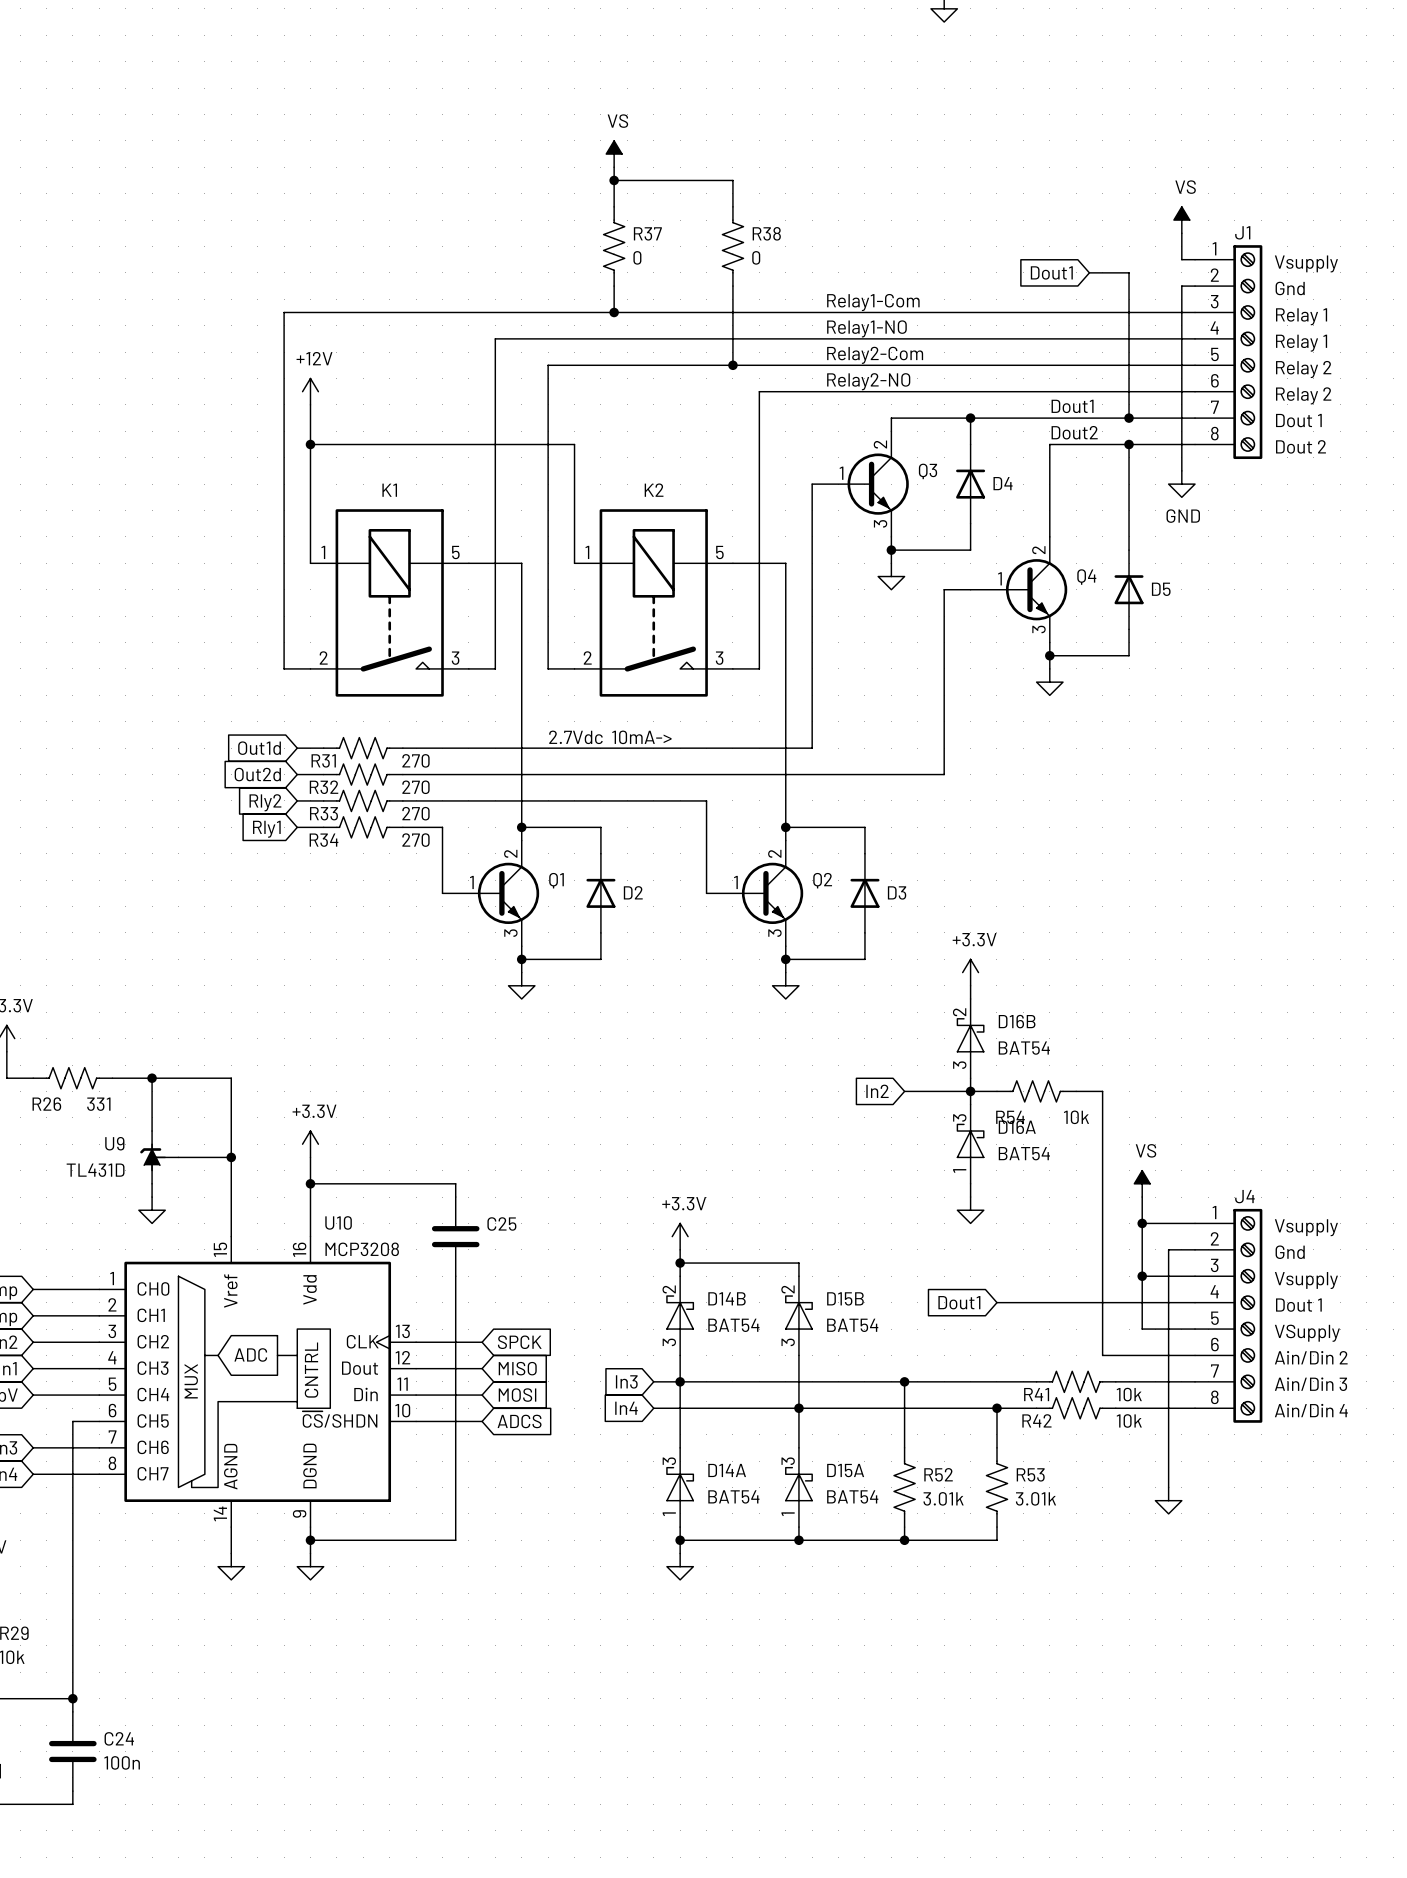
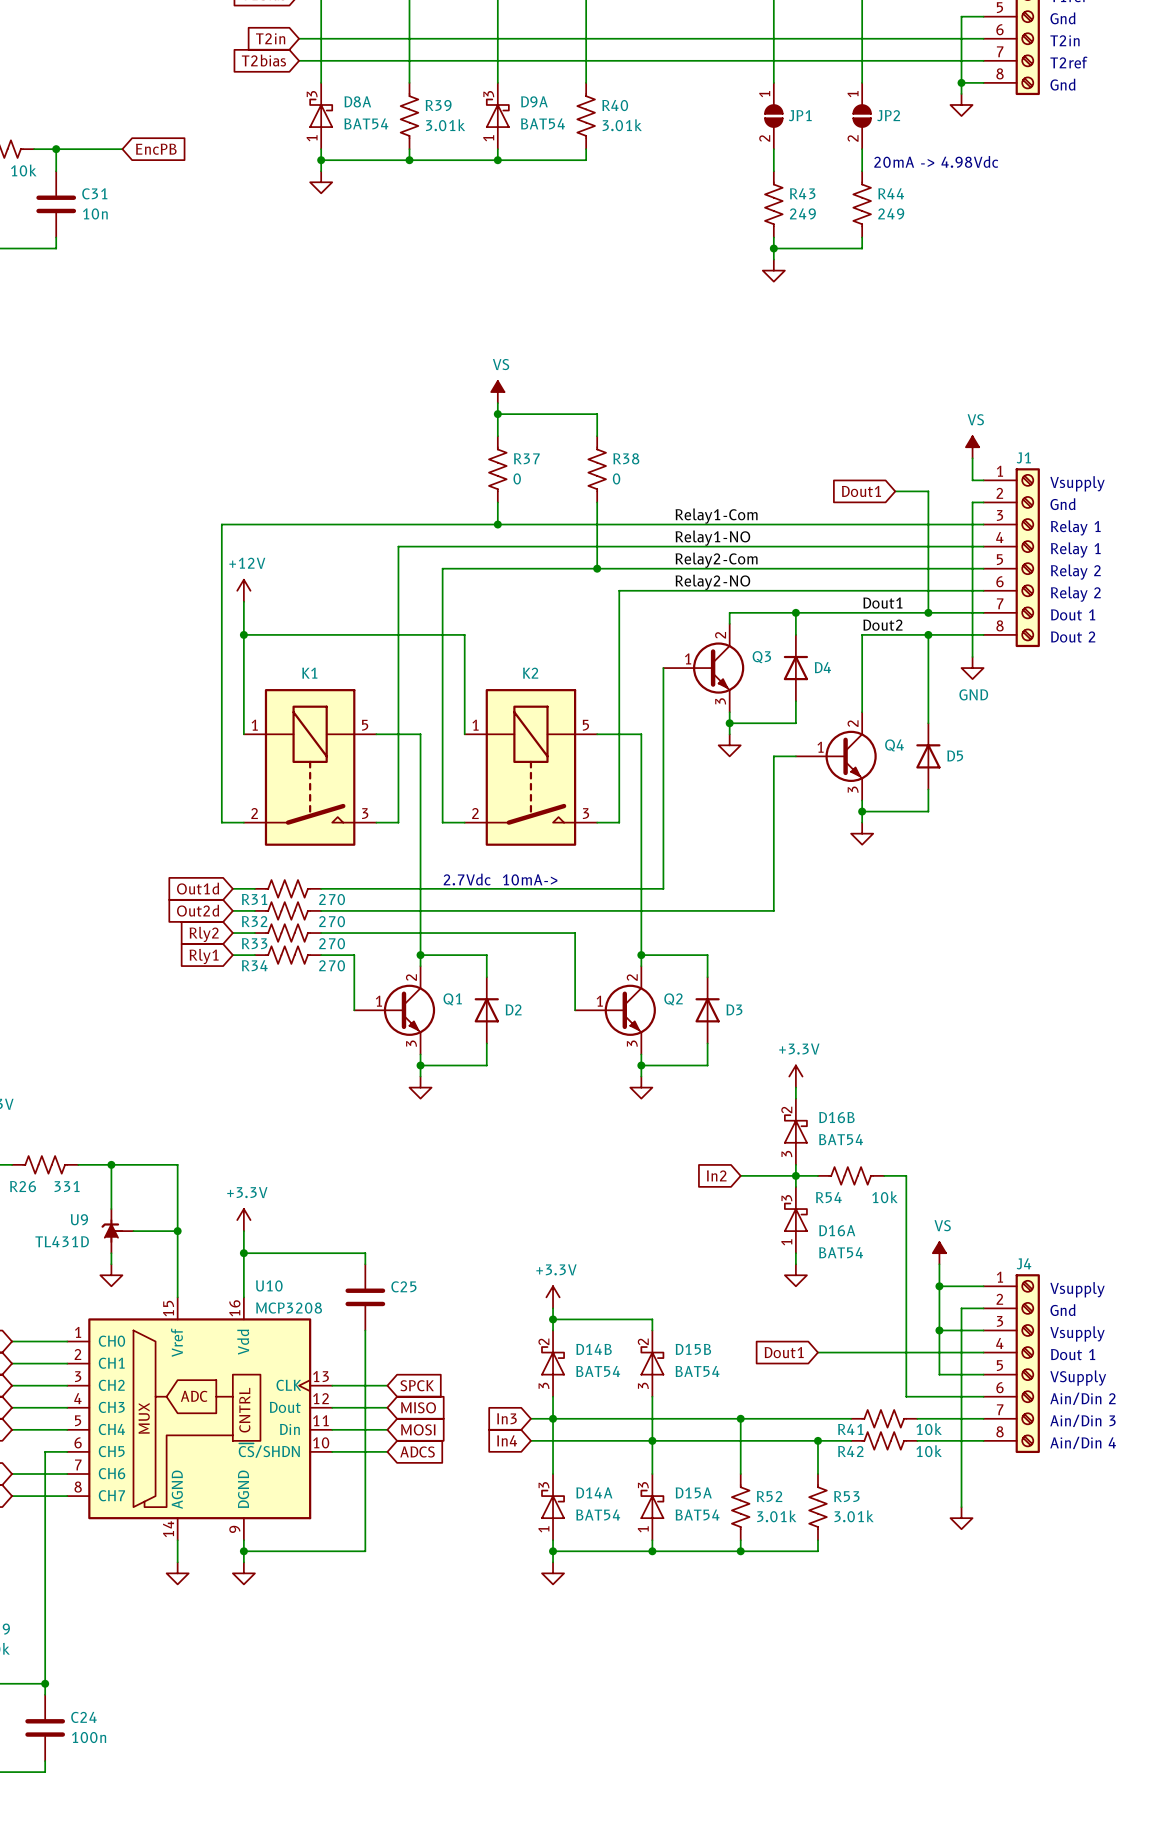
D16A name position: D16A (1017, 1127) -> D16A (837, 1230)
D16A value position: BAT54 (1024, 1153) -> BAT54 (841, 1252)

